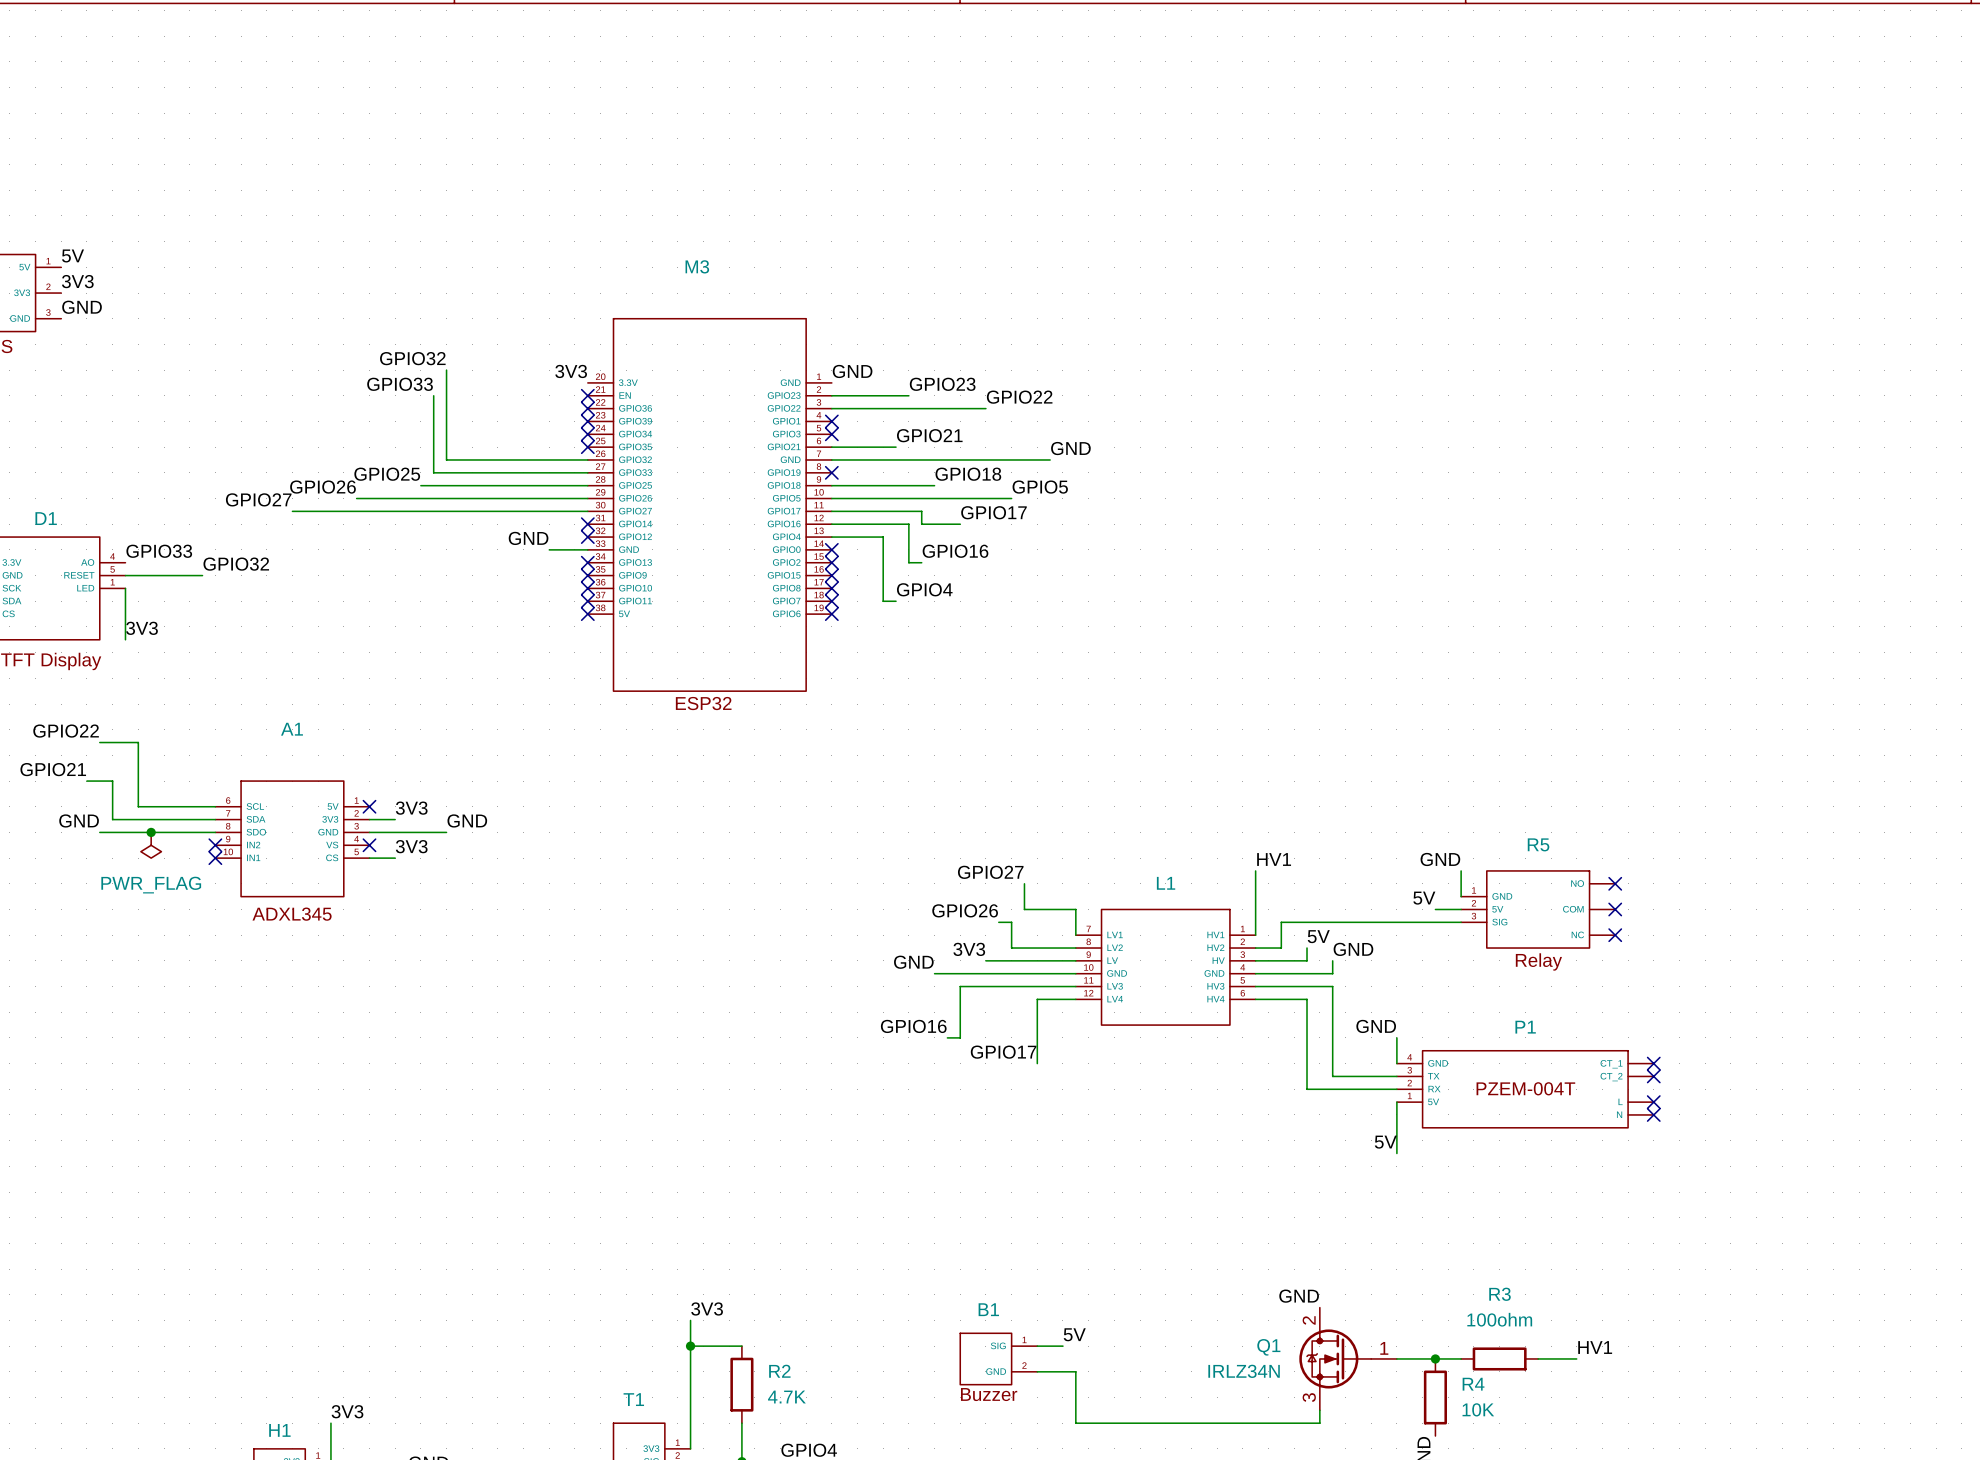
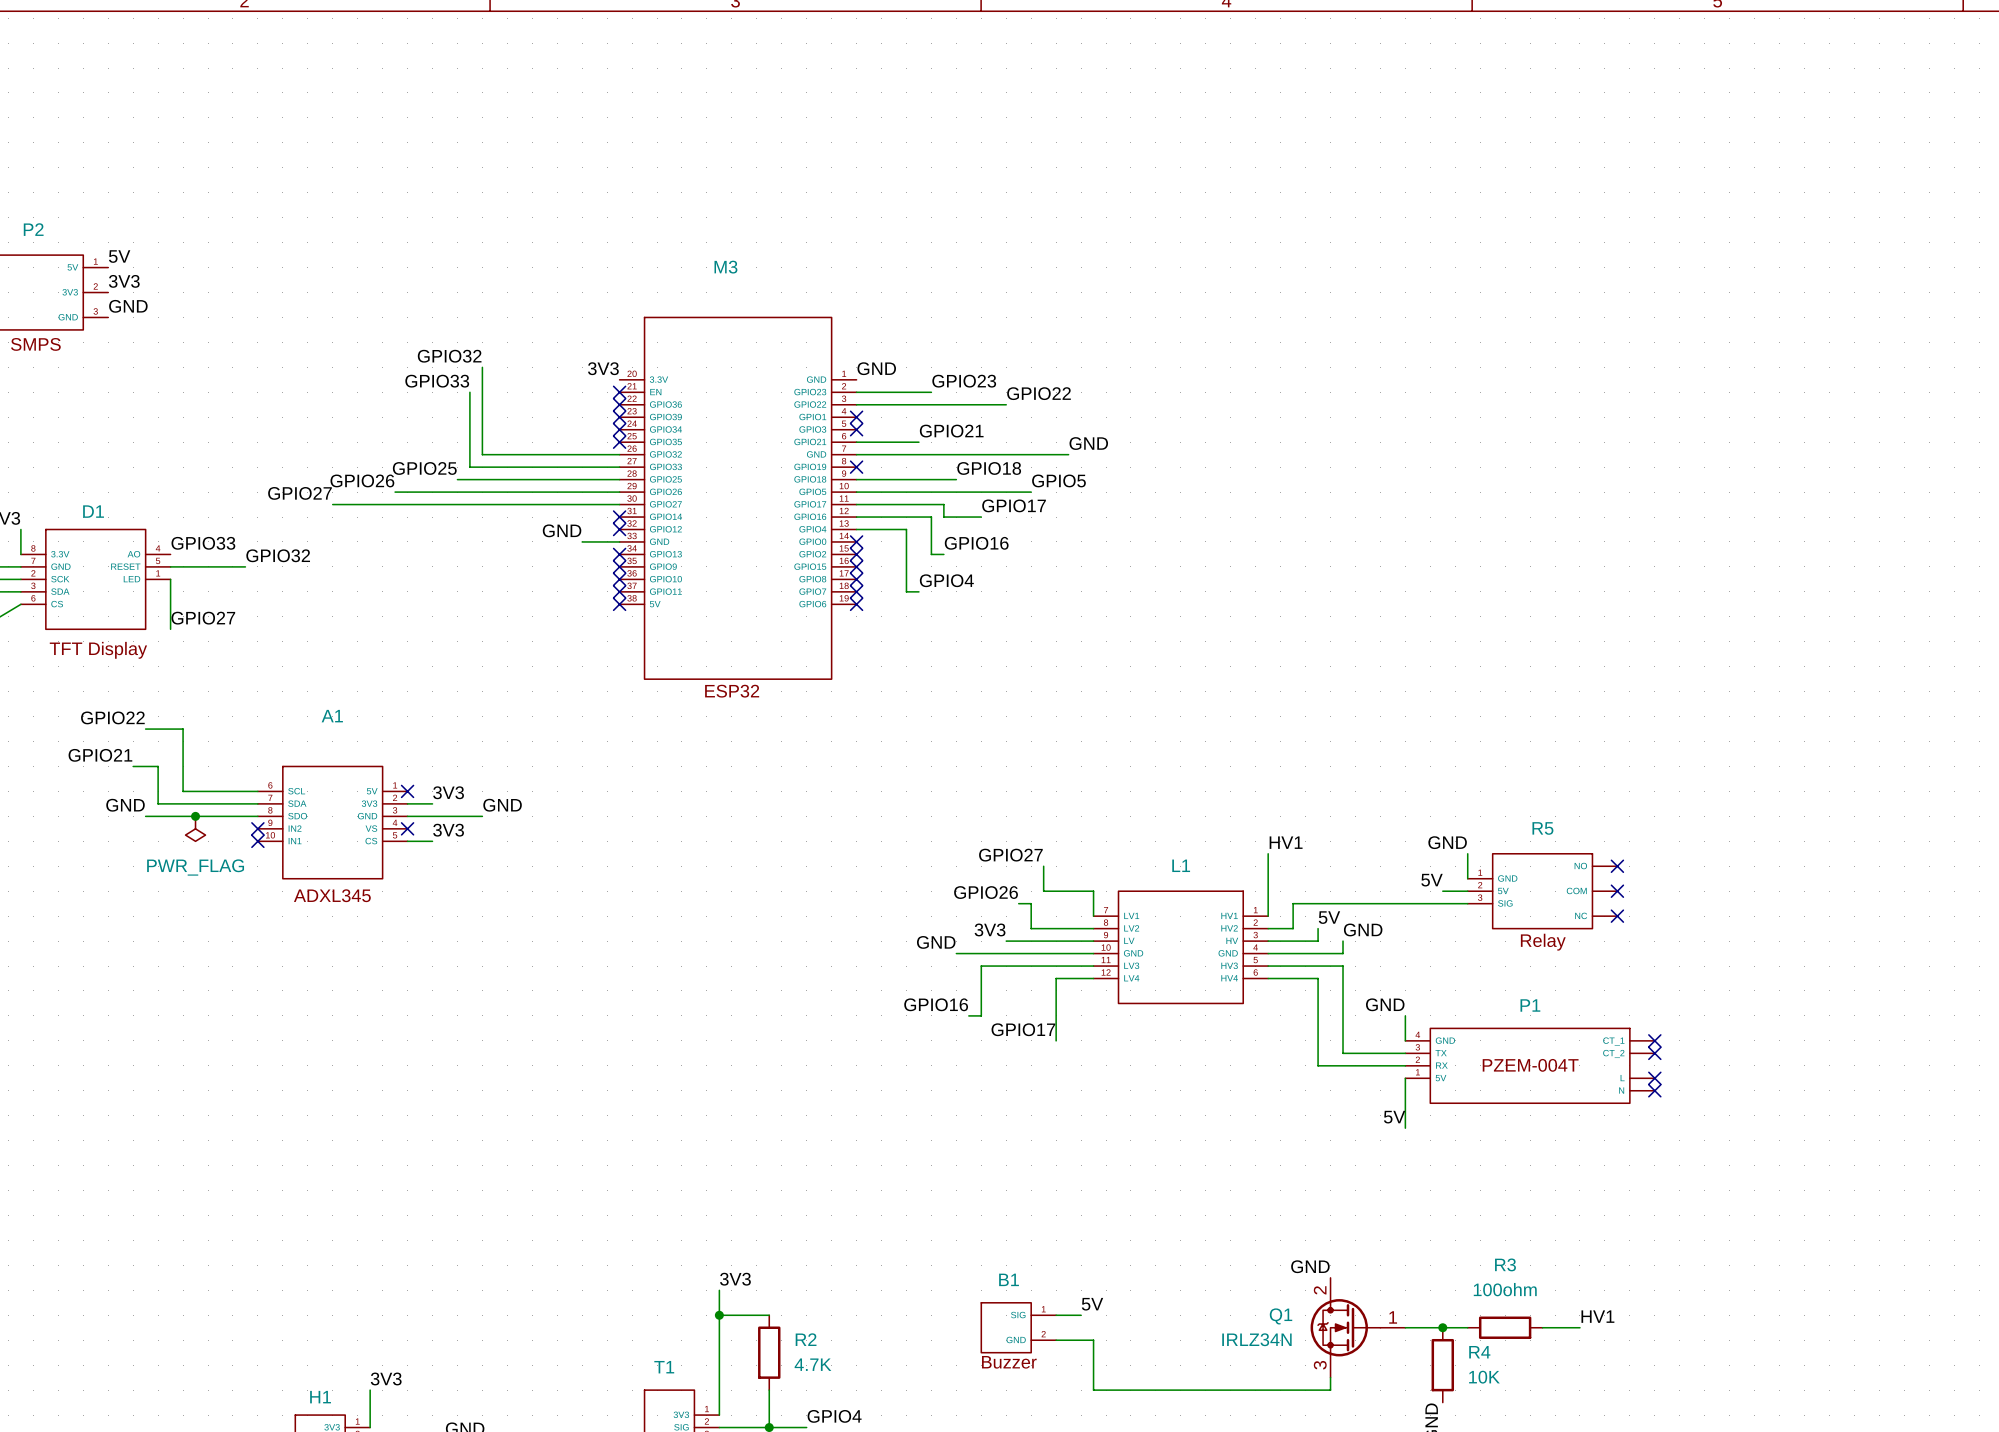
label: 3V3 (142, 628) -> GPIO27 (203, 618)

